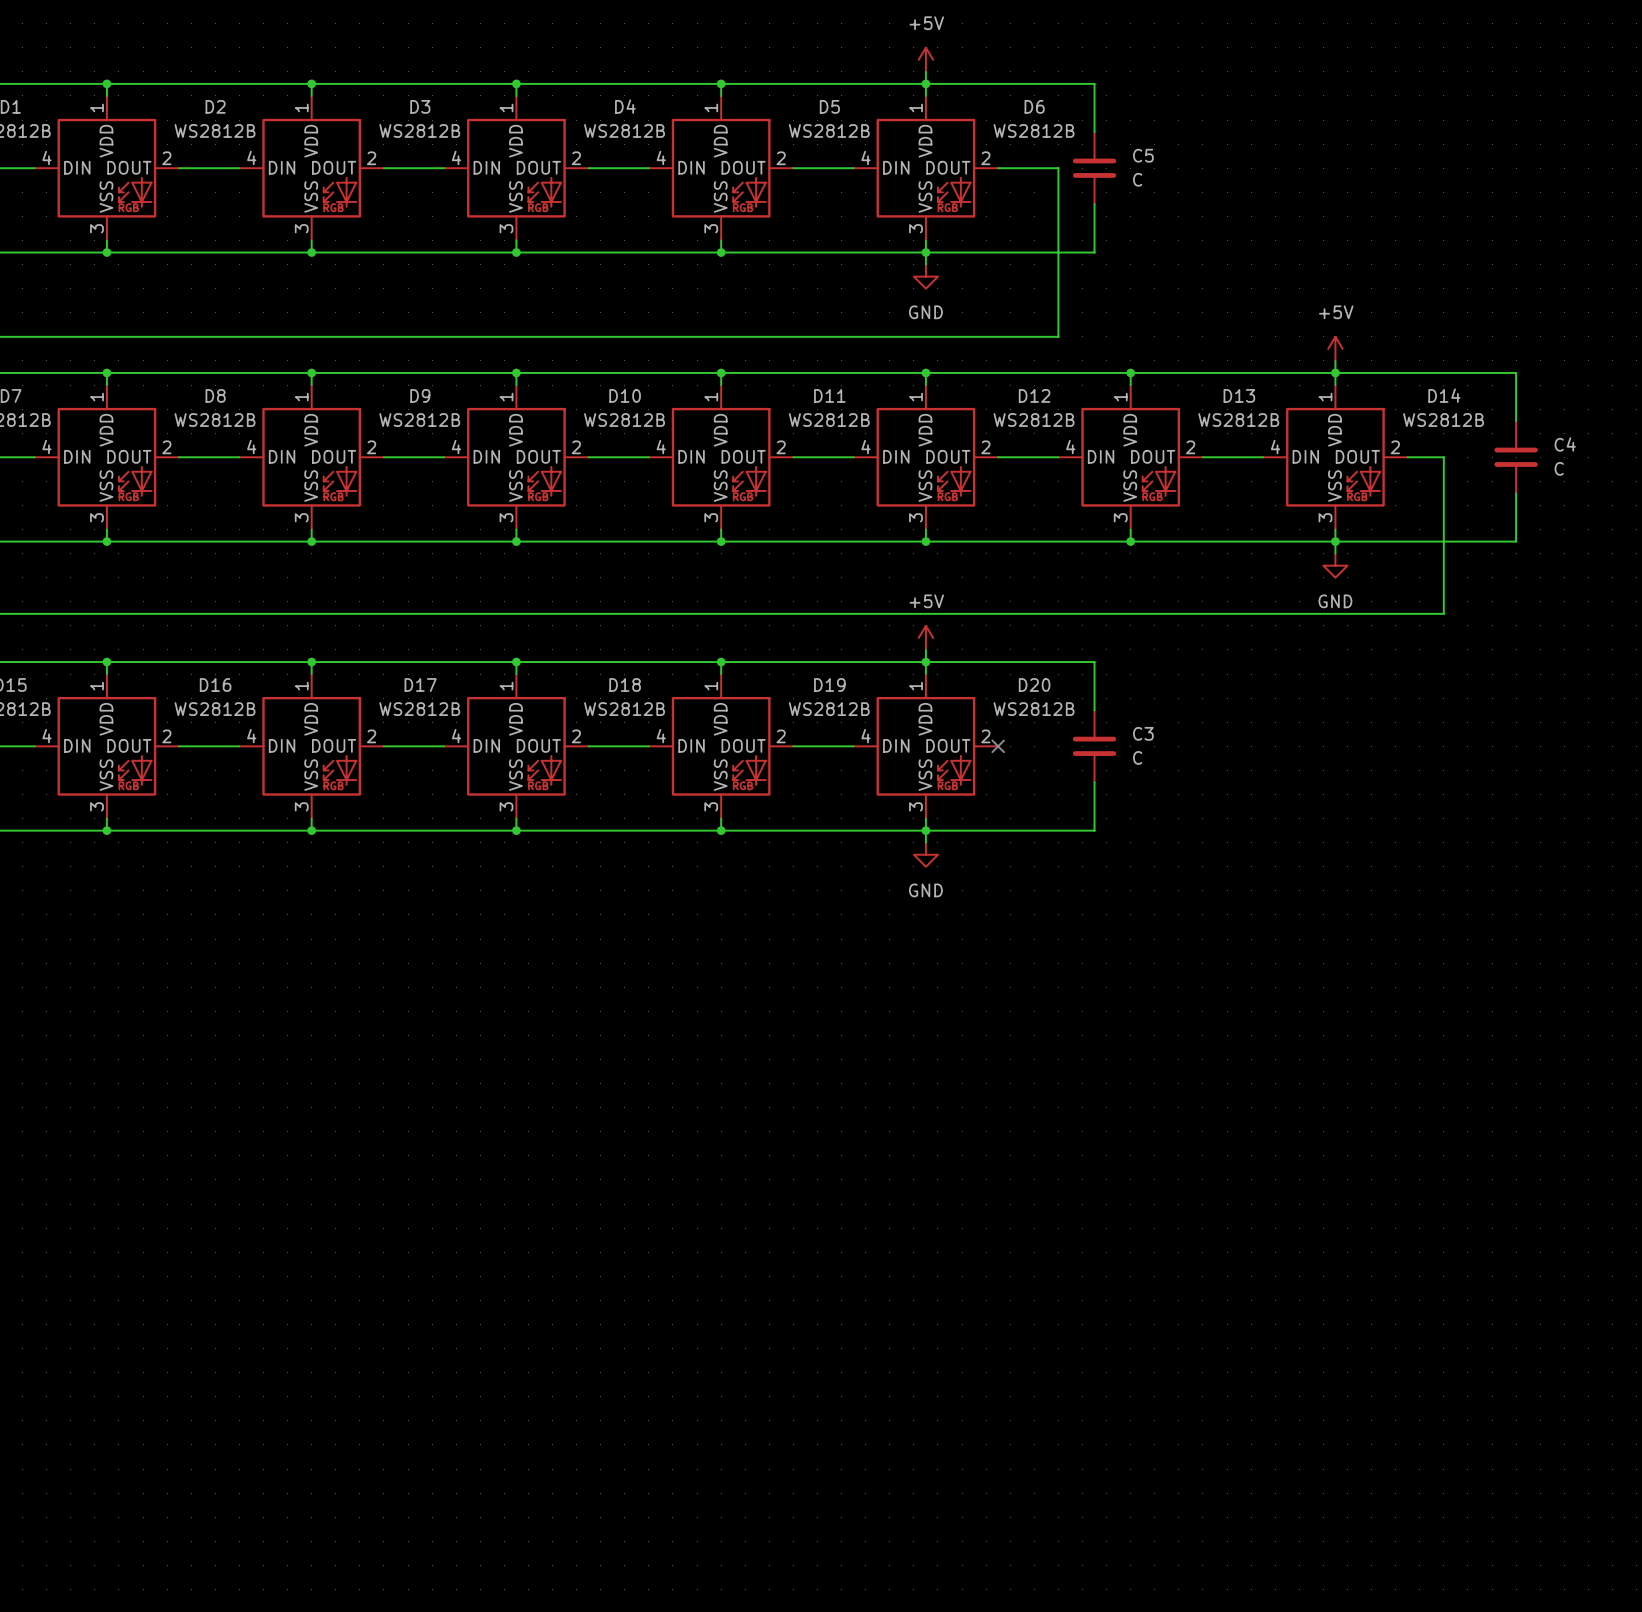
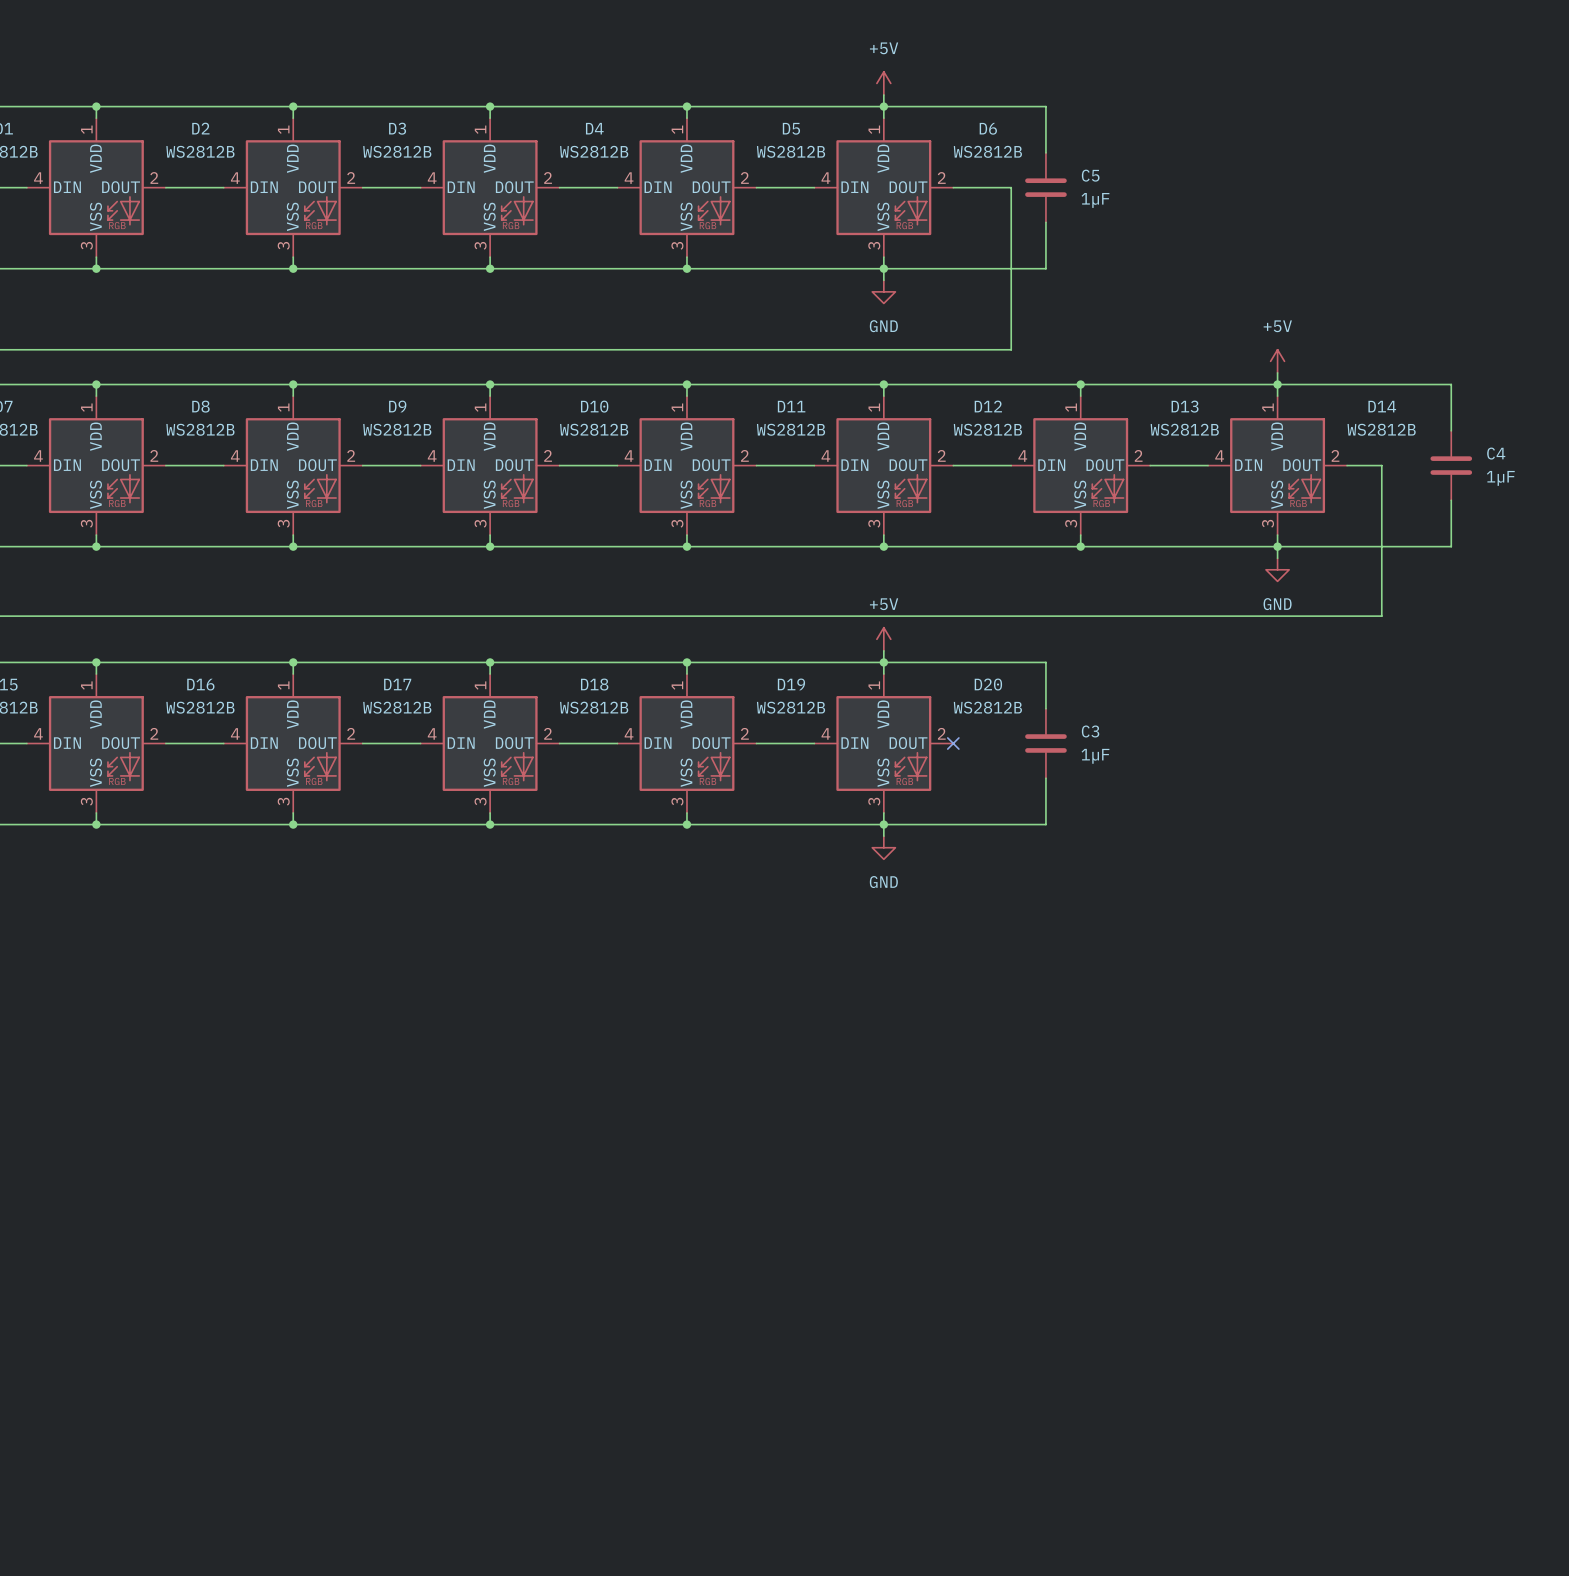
C5 value: C (1137, 179) -> 1µF (1095, 200)
C4 value: C (1559, 468) -> 1µF (1500, 478)
C3 value: C (1137, 757) -> 1µF (1095, 756)

